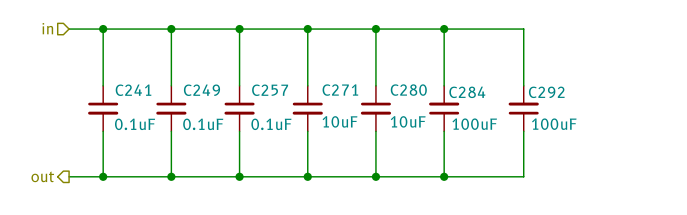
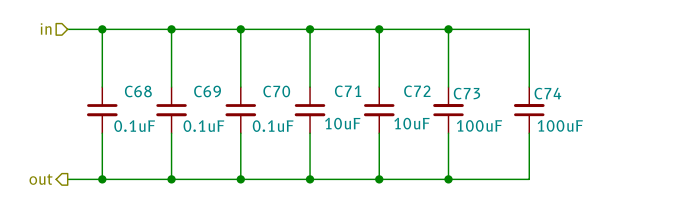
C241 name: C241 (133, 90) -> C68 (138, 91)
C249 name: C249 (201, 90) -> C69 (207, 91)
C257 name: C257 (270, 90) -> C70 (276, 91)
C271 name: C271 (340, 90) -> C71 (348, 91)
C280 name: C280 (408, 90) -> C72 (417, 91)
C284 name: C284 (467, 92) -> C73 (466, 93)
C292 name: C292 (546, 92) -> C74 (547, 93)

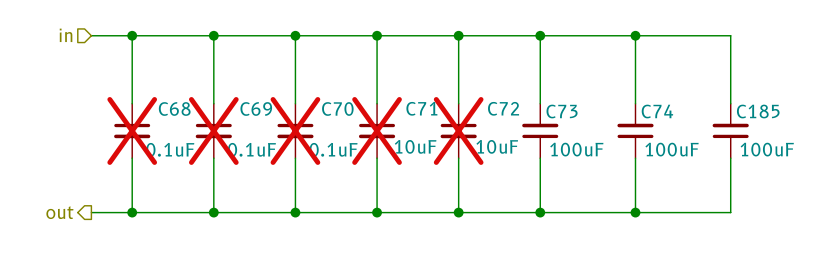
wire: none -> (635, 35) (730, 35) (730, 103)
junction: none -> (635, 35)
C68 do-not-place cross: none -> (132, 130)
C69 do-not-place cross: none -> (213, 130)
C70 do-not-place cross: none -> (295, 130)
C71 do-not-place cross: none -> (377, 130)
C72 do-not-place cross: none -> (458, 130)
C185: none -> 100uF (730, 130)
wire: none -> (730, 158) (730, 212) (635, 212)
junction: none -> (635, 212)

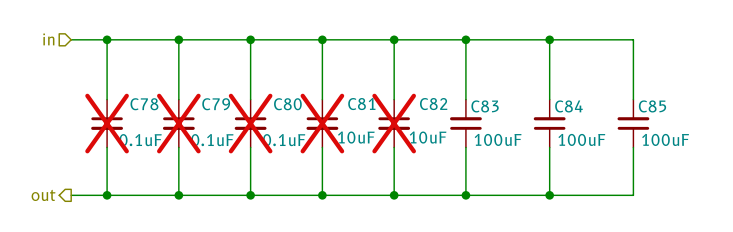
C68 name: C68 (174, 108) -> C78 (144, 104)
C69 name: C69 (256, 108) -> C79 (216, 104)
C70 name: C70 (337, 108) -> C80 (287, 104)
C71 name: C71 (421, 108) -> C81 (361, 104)
C72 name: C72 (503, 108) -> C82 (433, 104)
C73 name: C73 (562, 111) -> C83 (485, 106)
C74 name: C74 (657, 111) -> C84 (568, 106)
C185 name: C185 (758, 111) -> C85 (652, 106)

